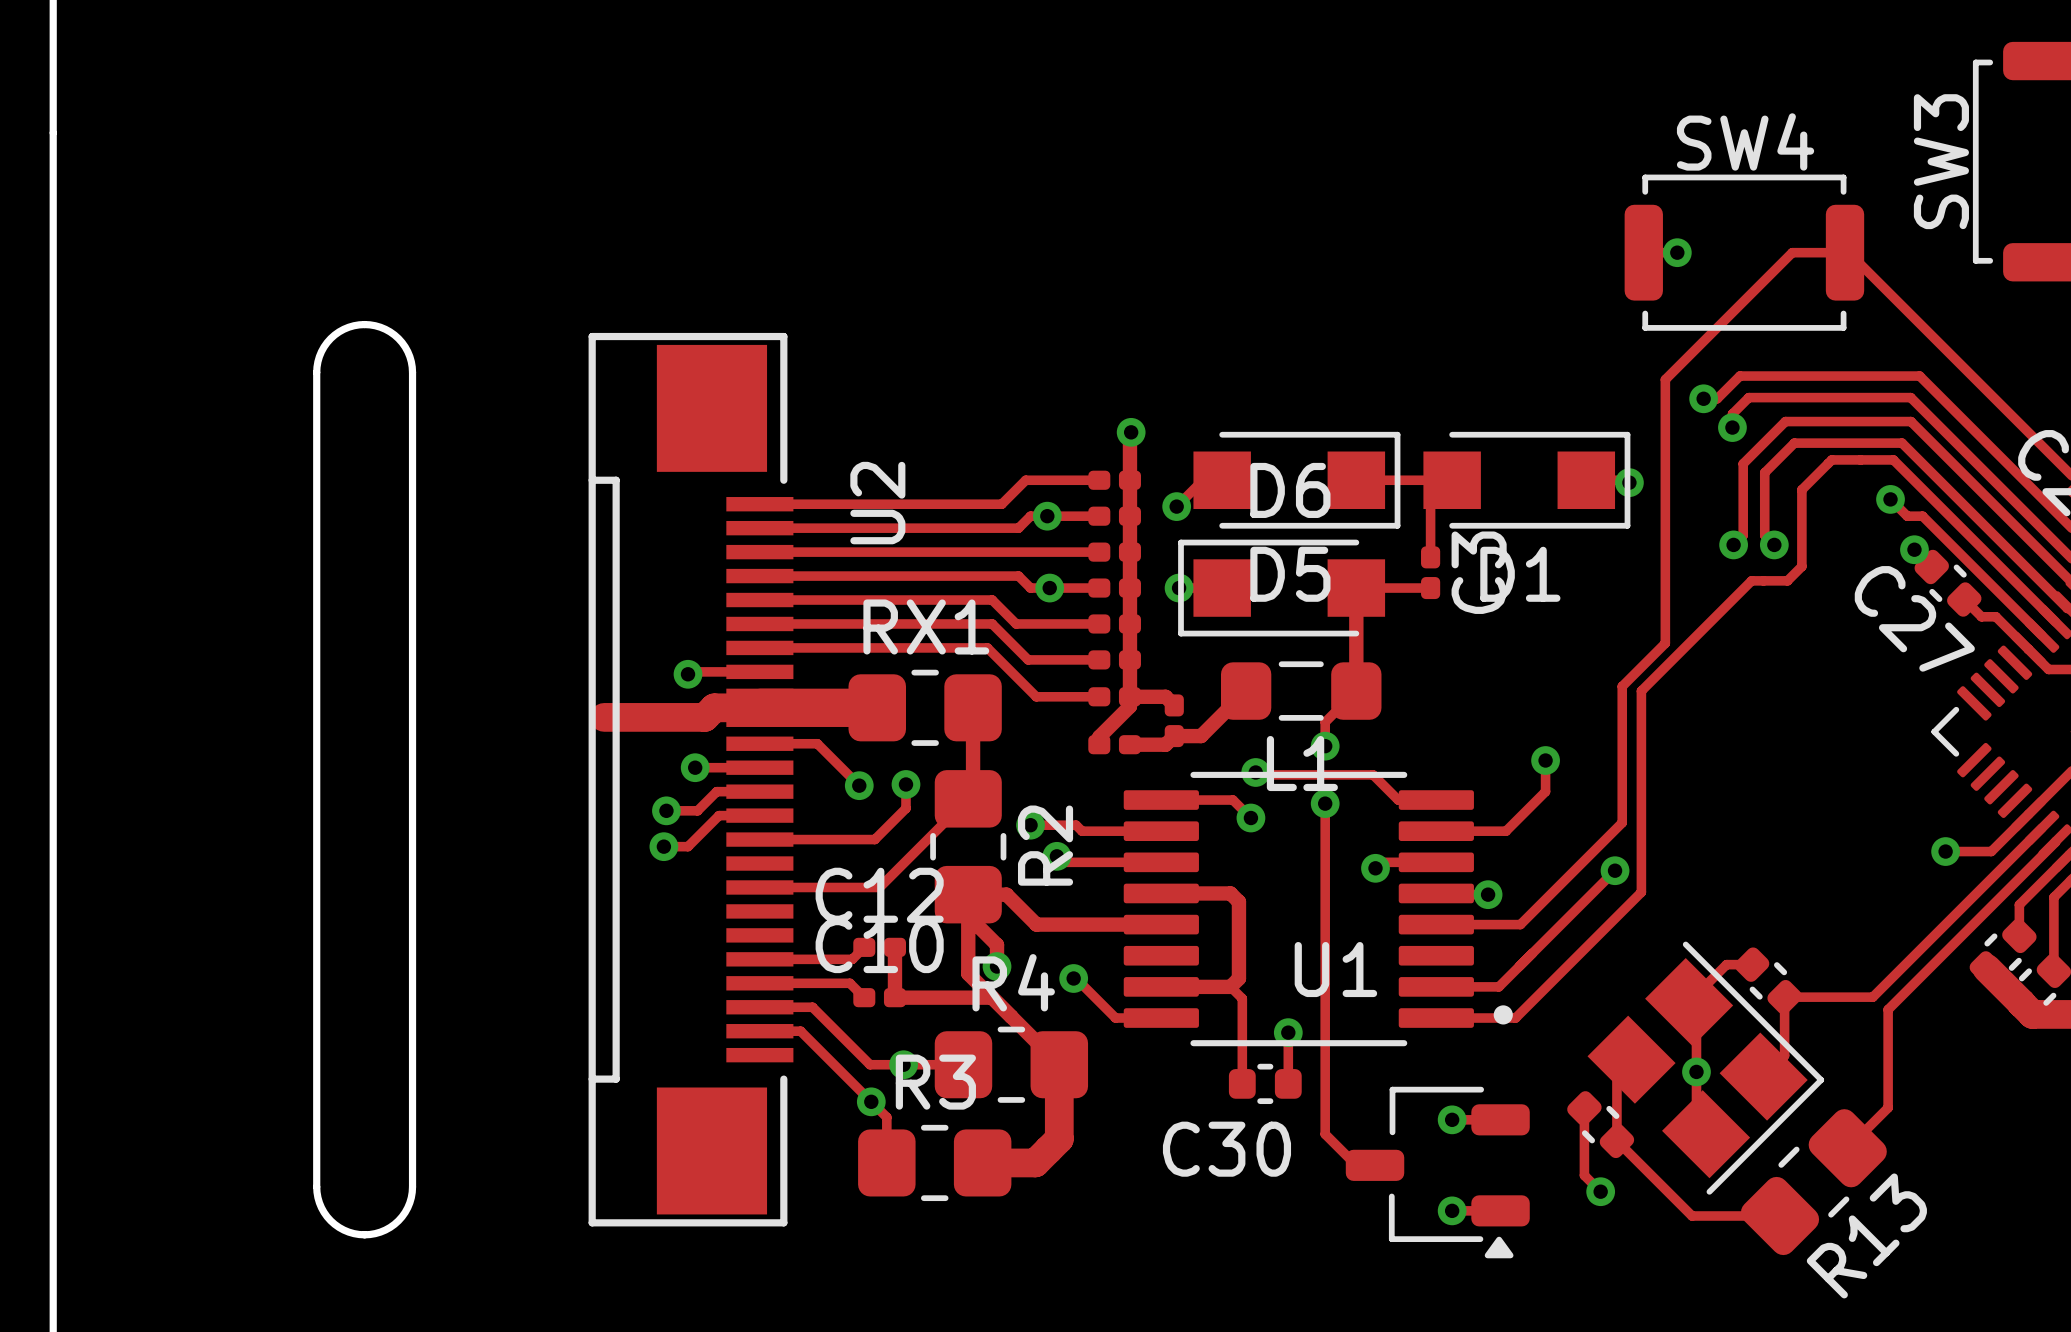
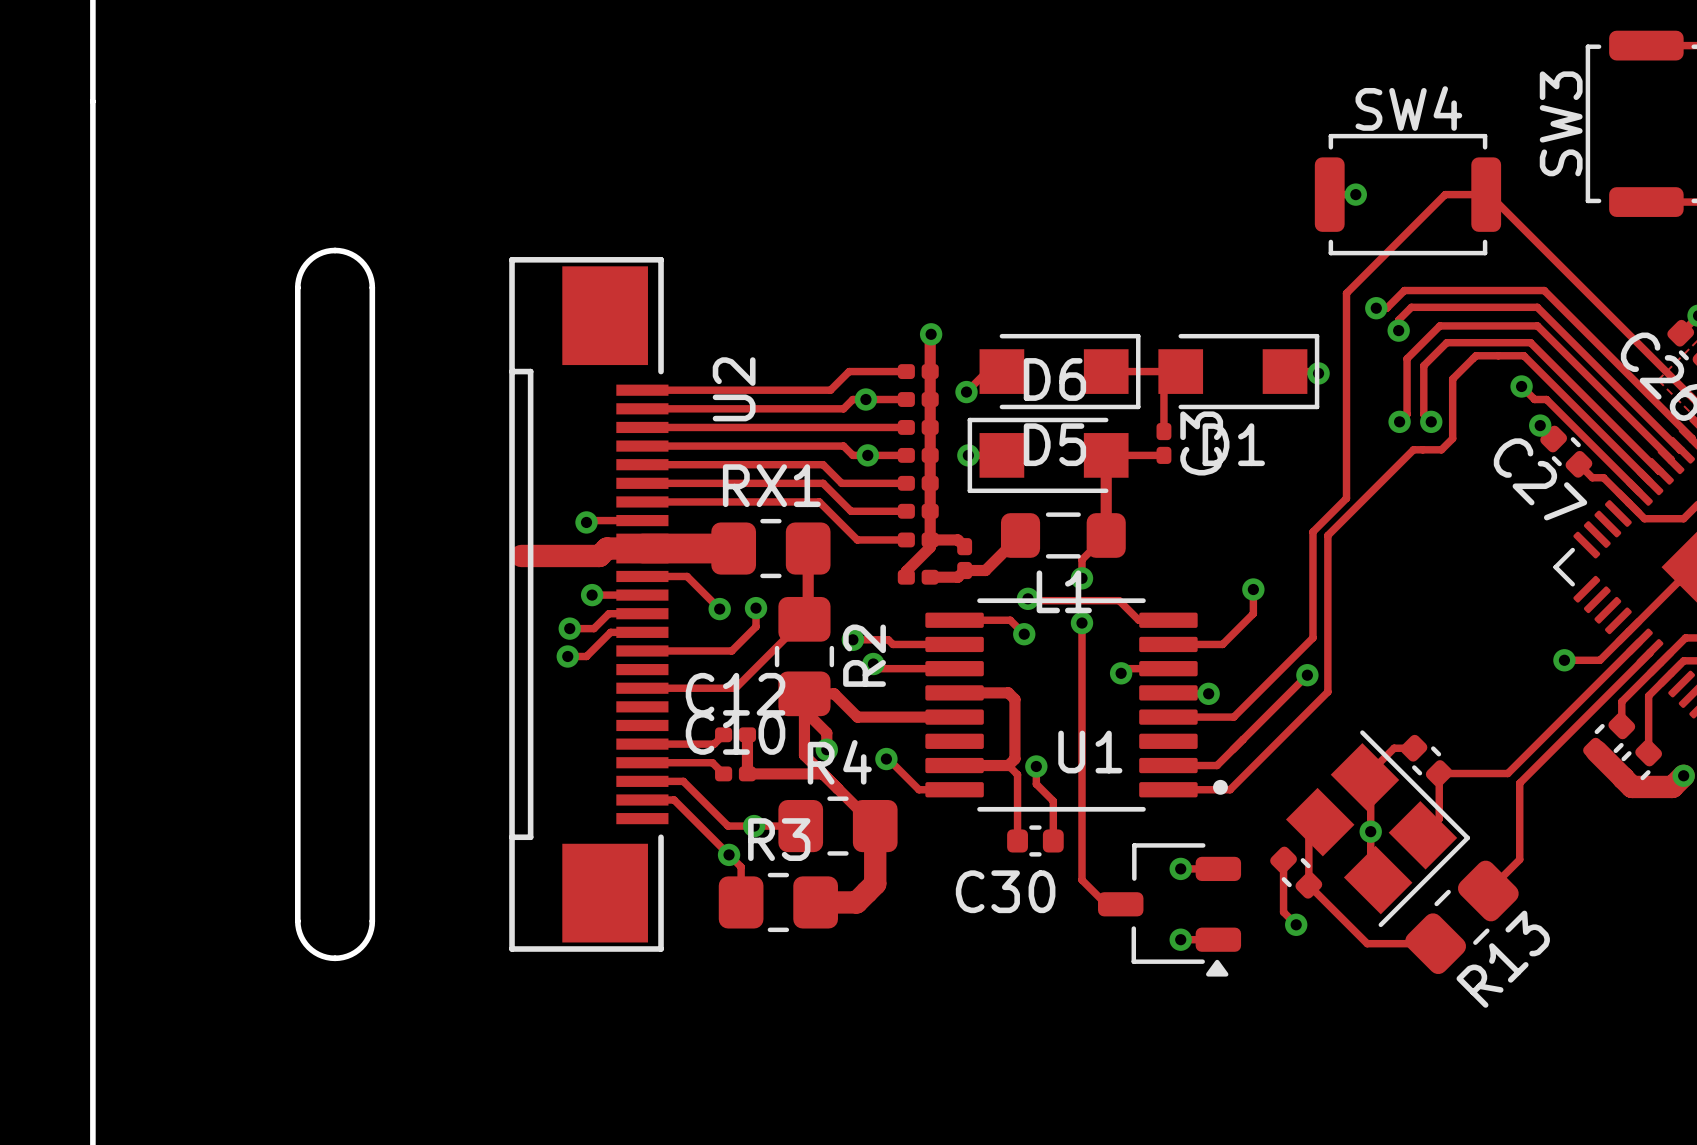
track: none -> (1036, 766) (1036, 784) (1053, 801)
via position: (1288, 1032) -> (1036, 766)

